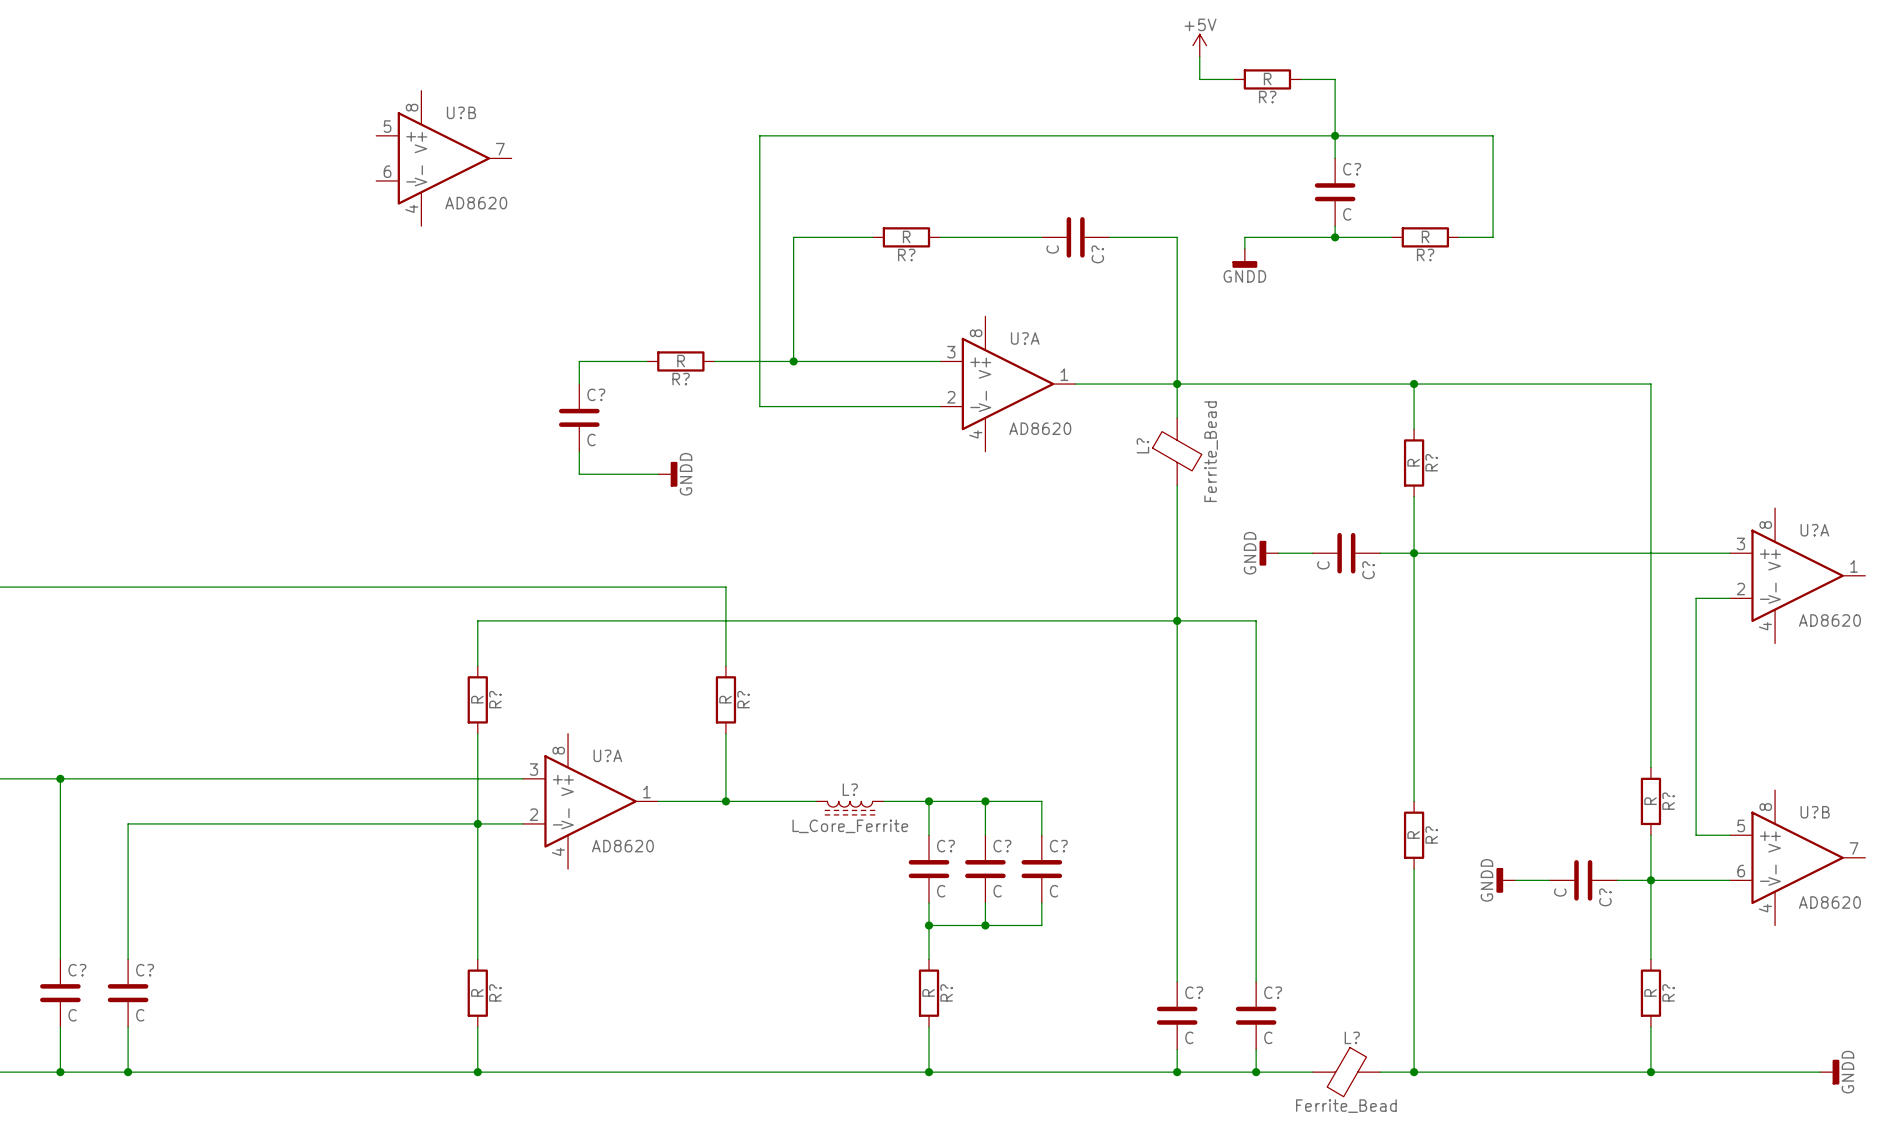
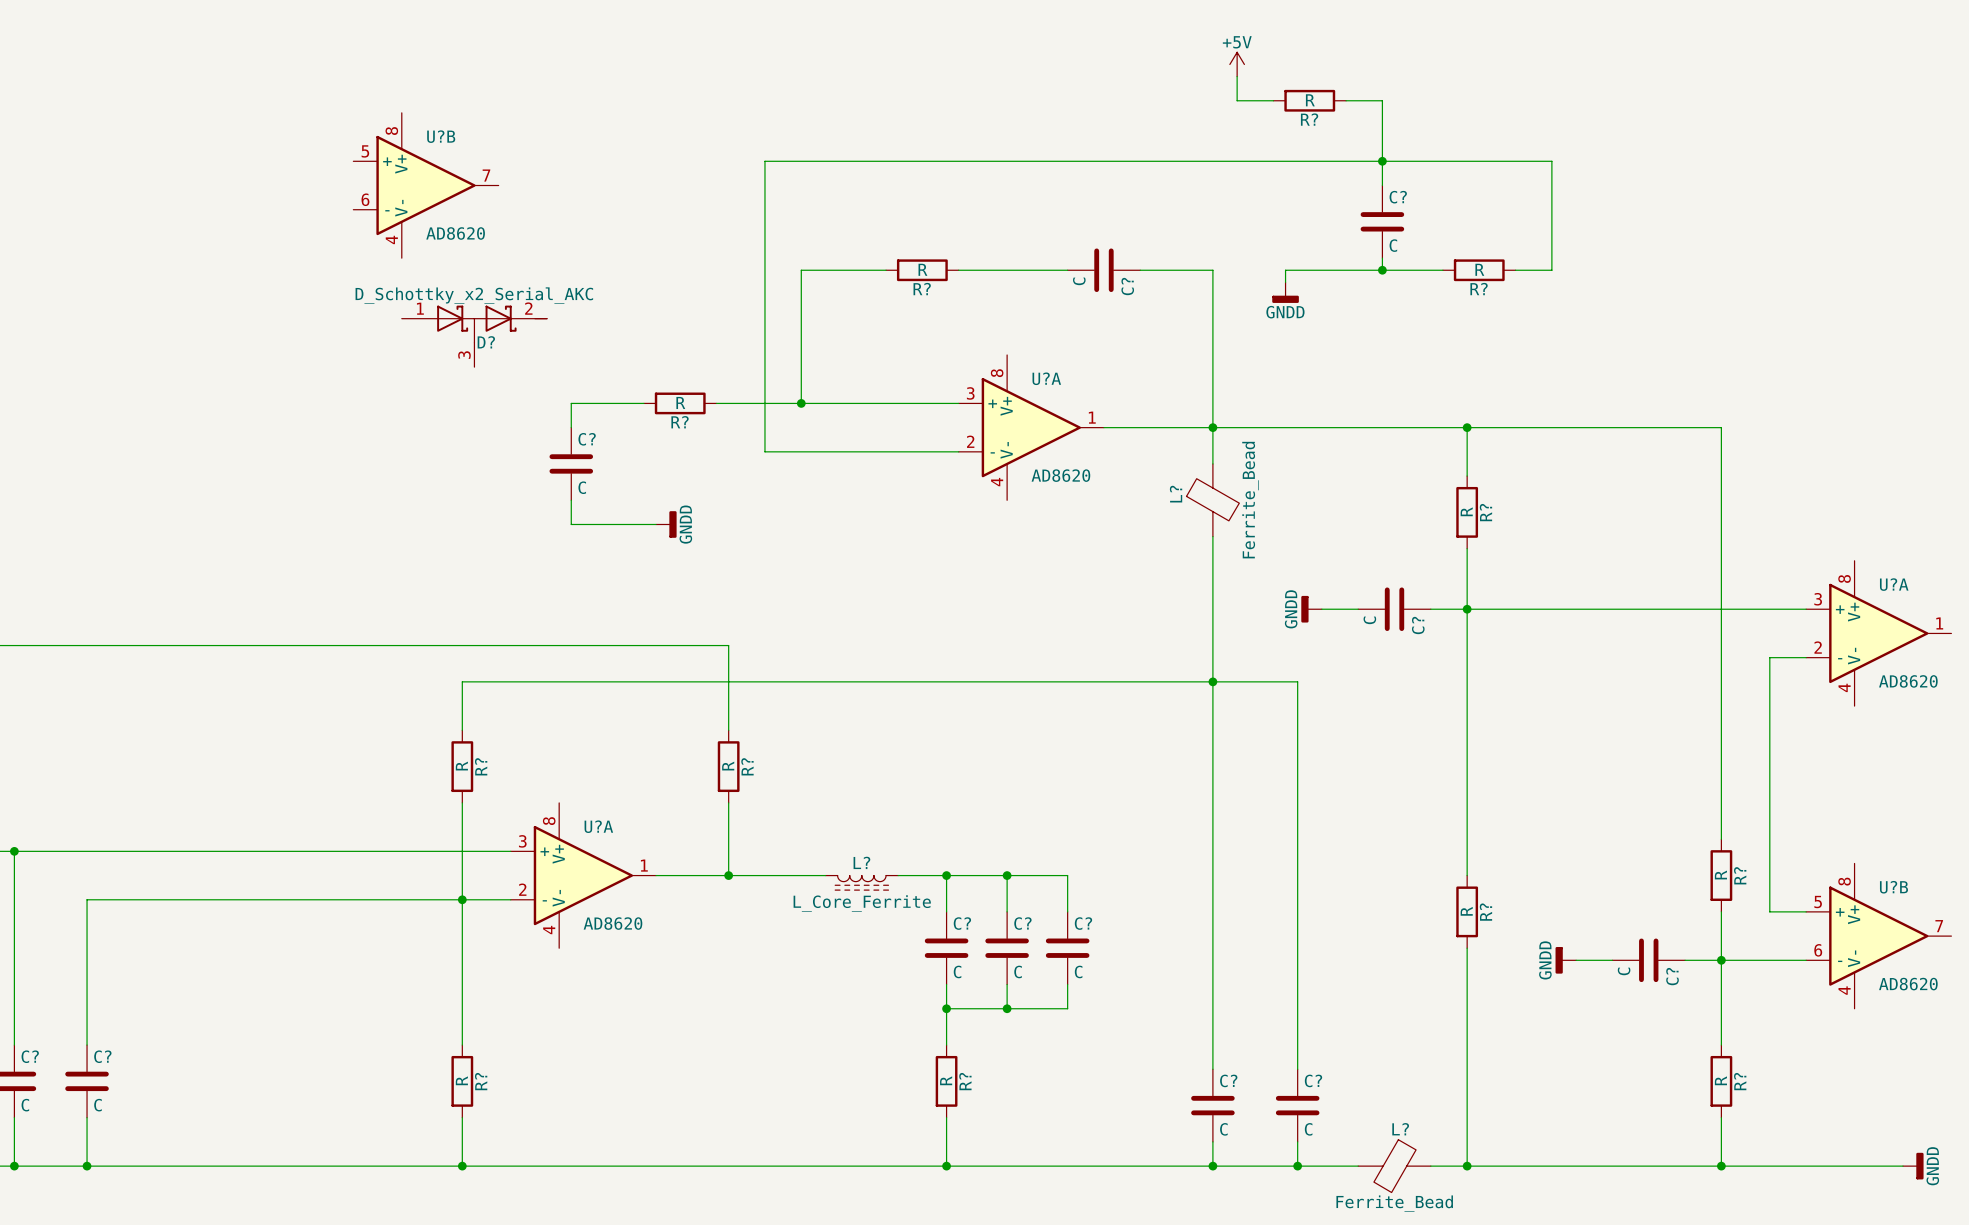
D?: none -> D_Schottky_x2_Serial_AKC (474, 336)

